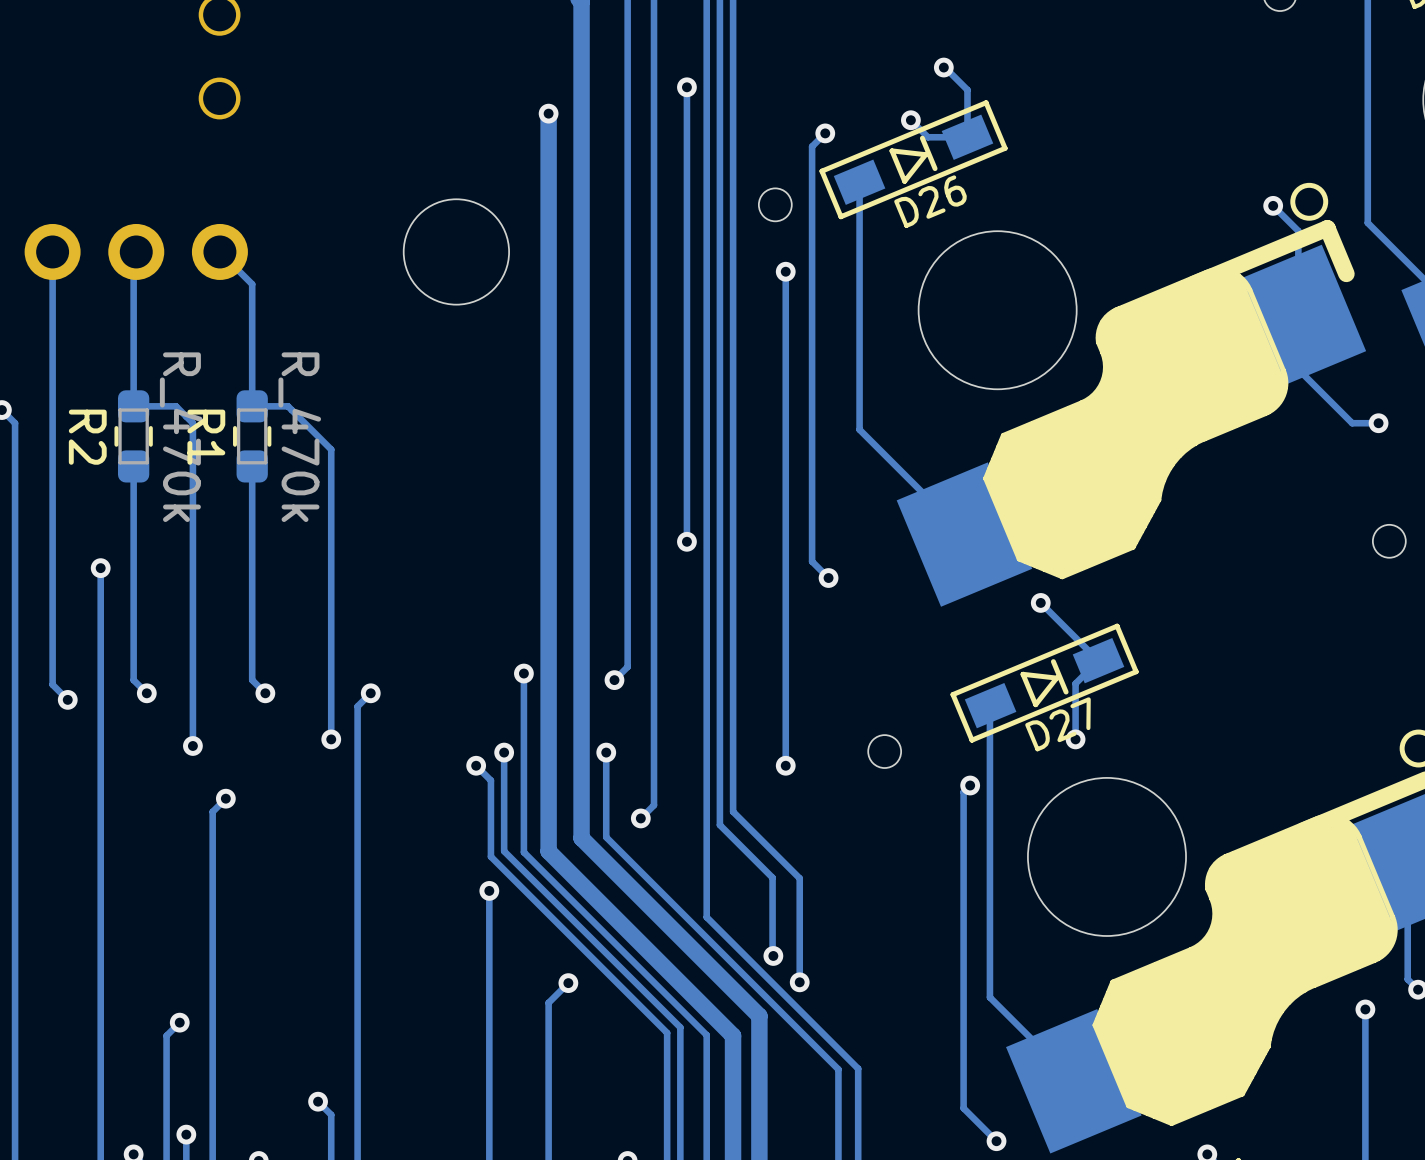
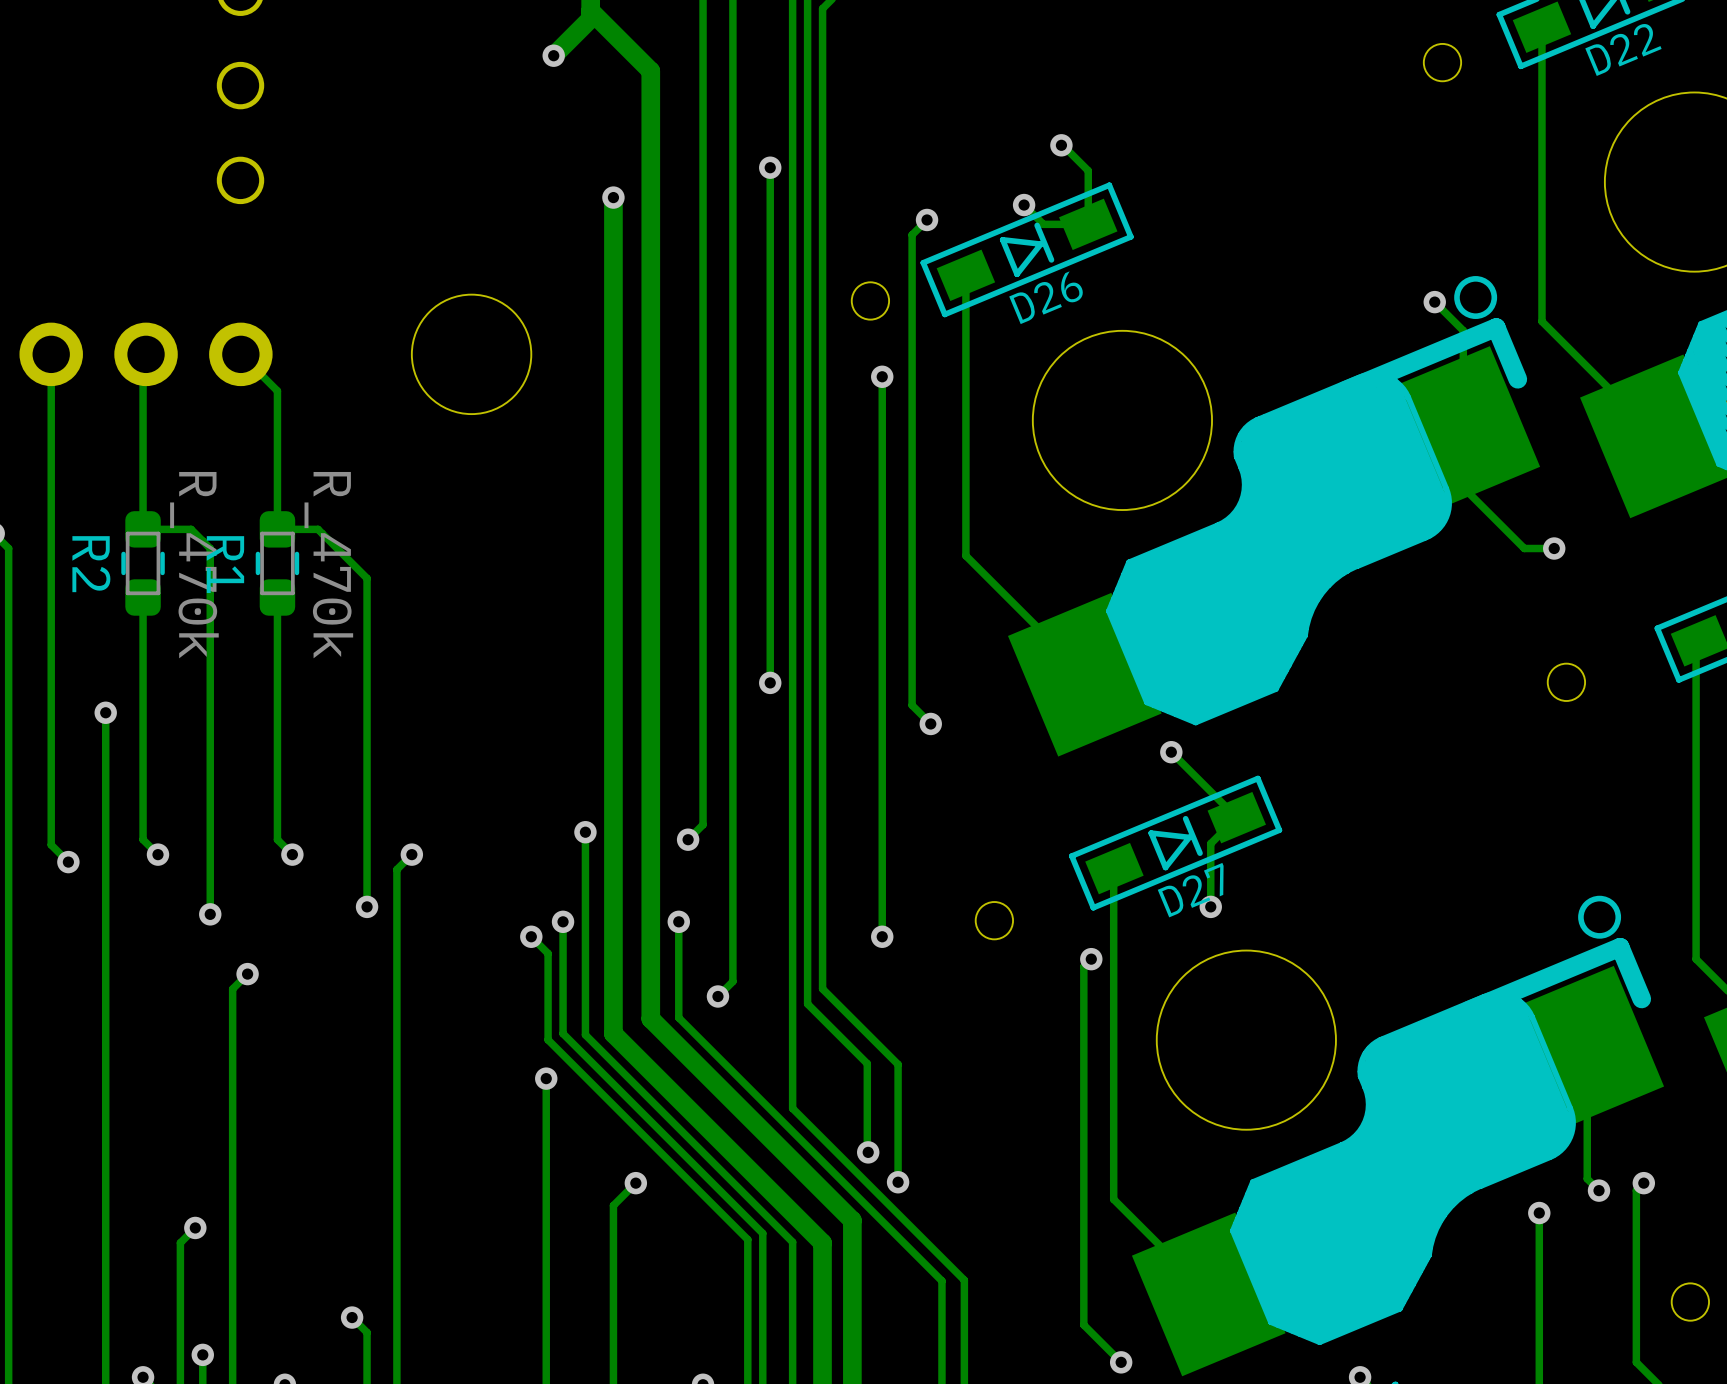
drawing position: (456, 251) -> (471, 354)

